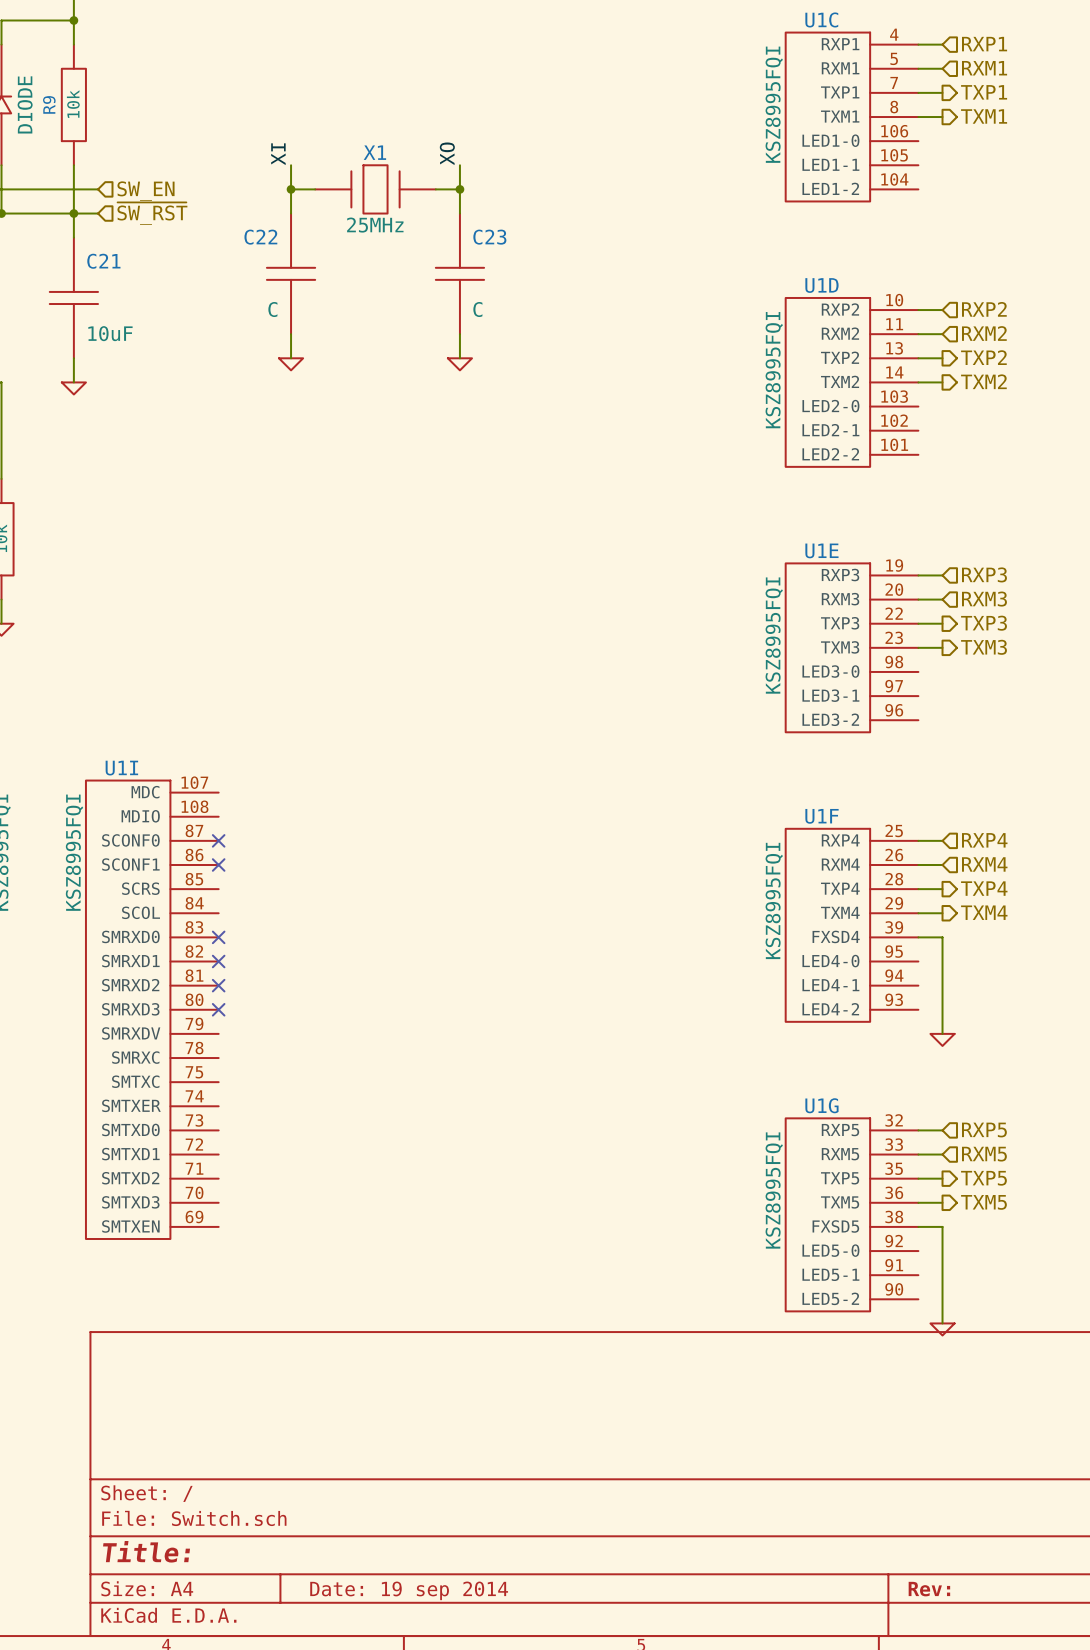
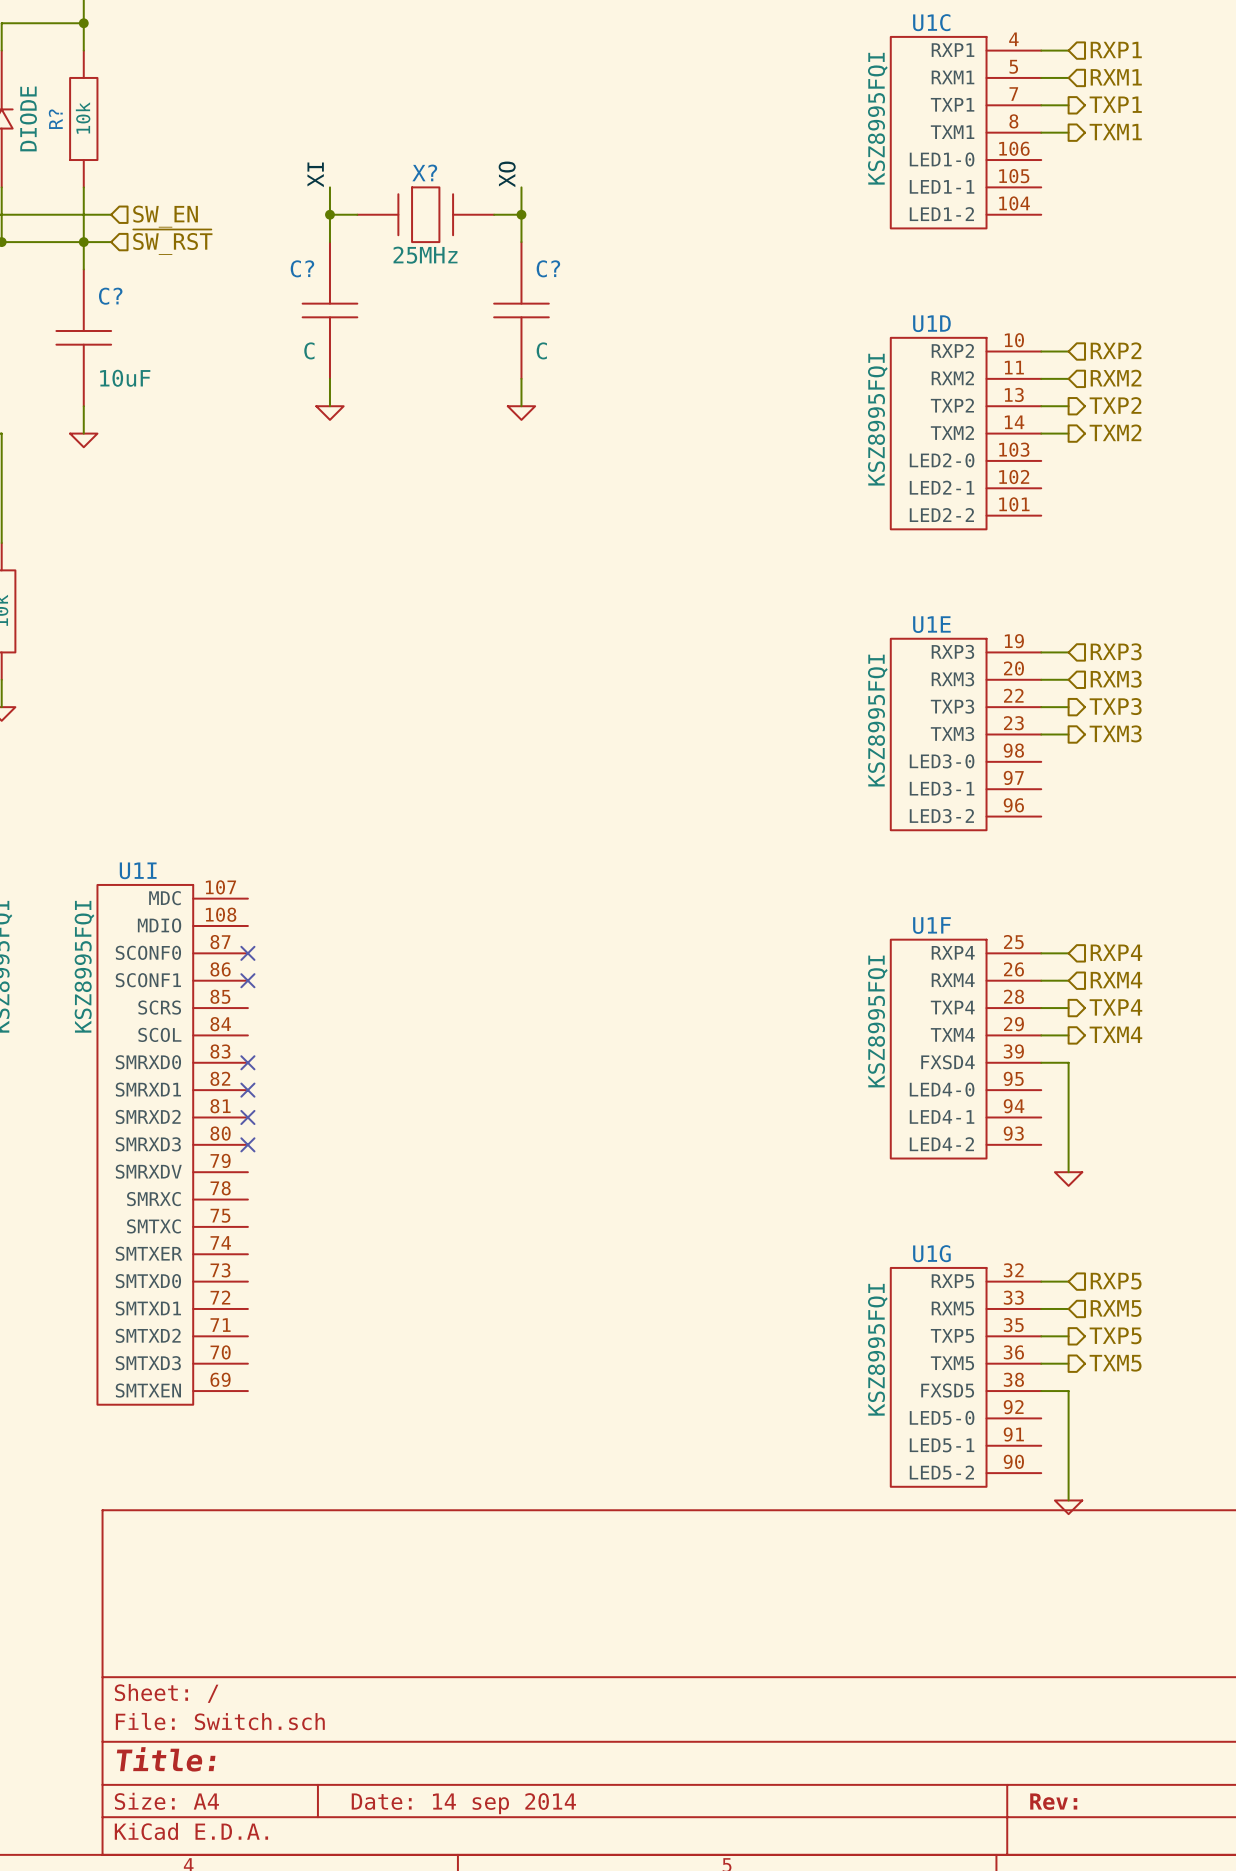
R9 name: R9 (49, 104) -> R? (55, 119)
X1 name: X1 (374, 152) -> X? (424, 172)
C22 name: C22 (260, 237) -> C? (302, 268)
C23 name: C23 (489, 237) -> C? (548, 268)
C21 name: C21 (103, 261) -> C? (110, 296)
title block: Date: 19 sep 2014 (409, 1590) -> Date: 14 sep 2014 (463, 1803)

